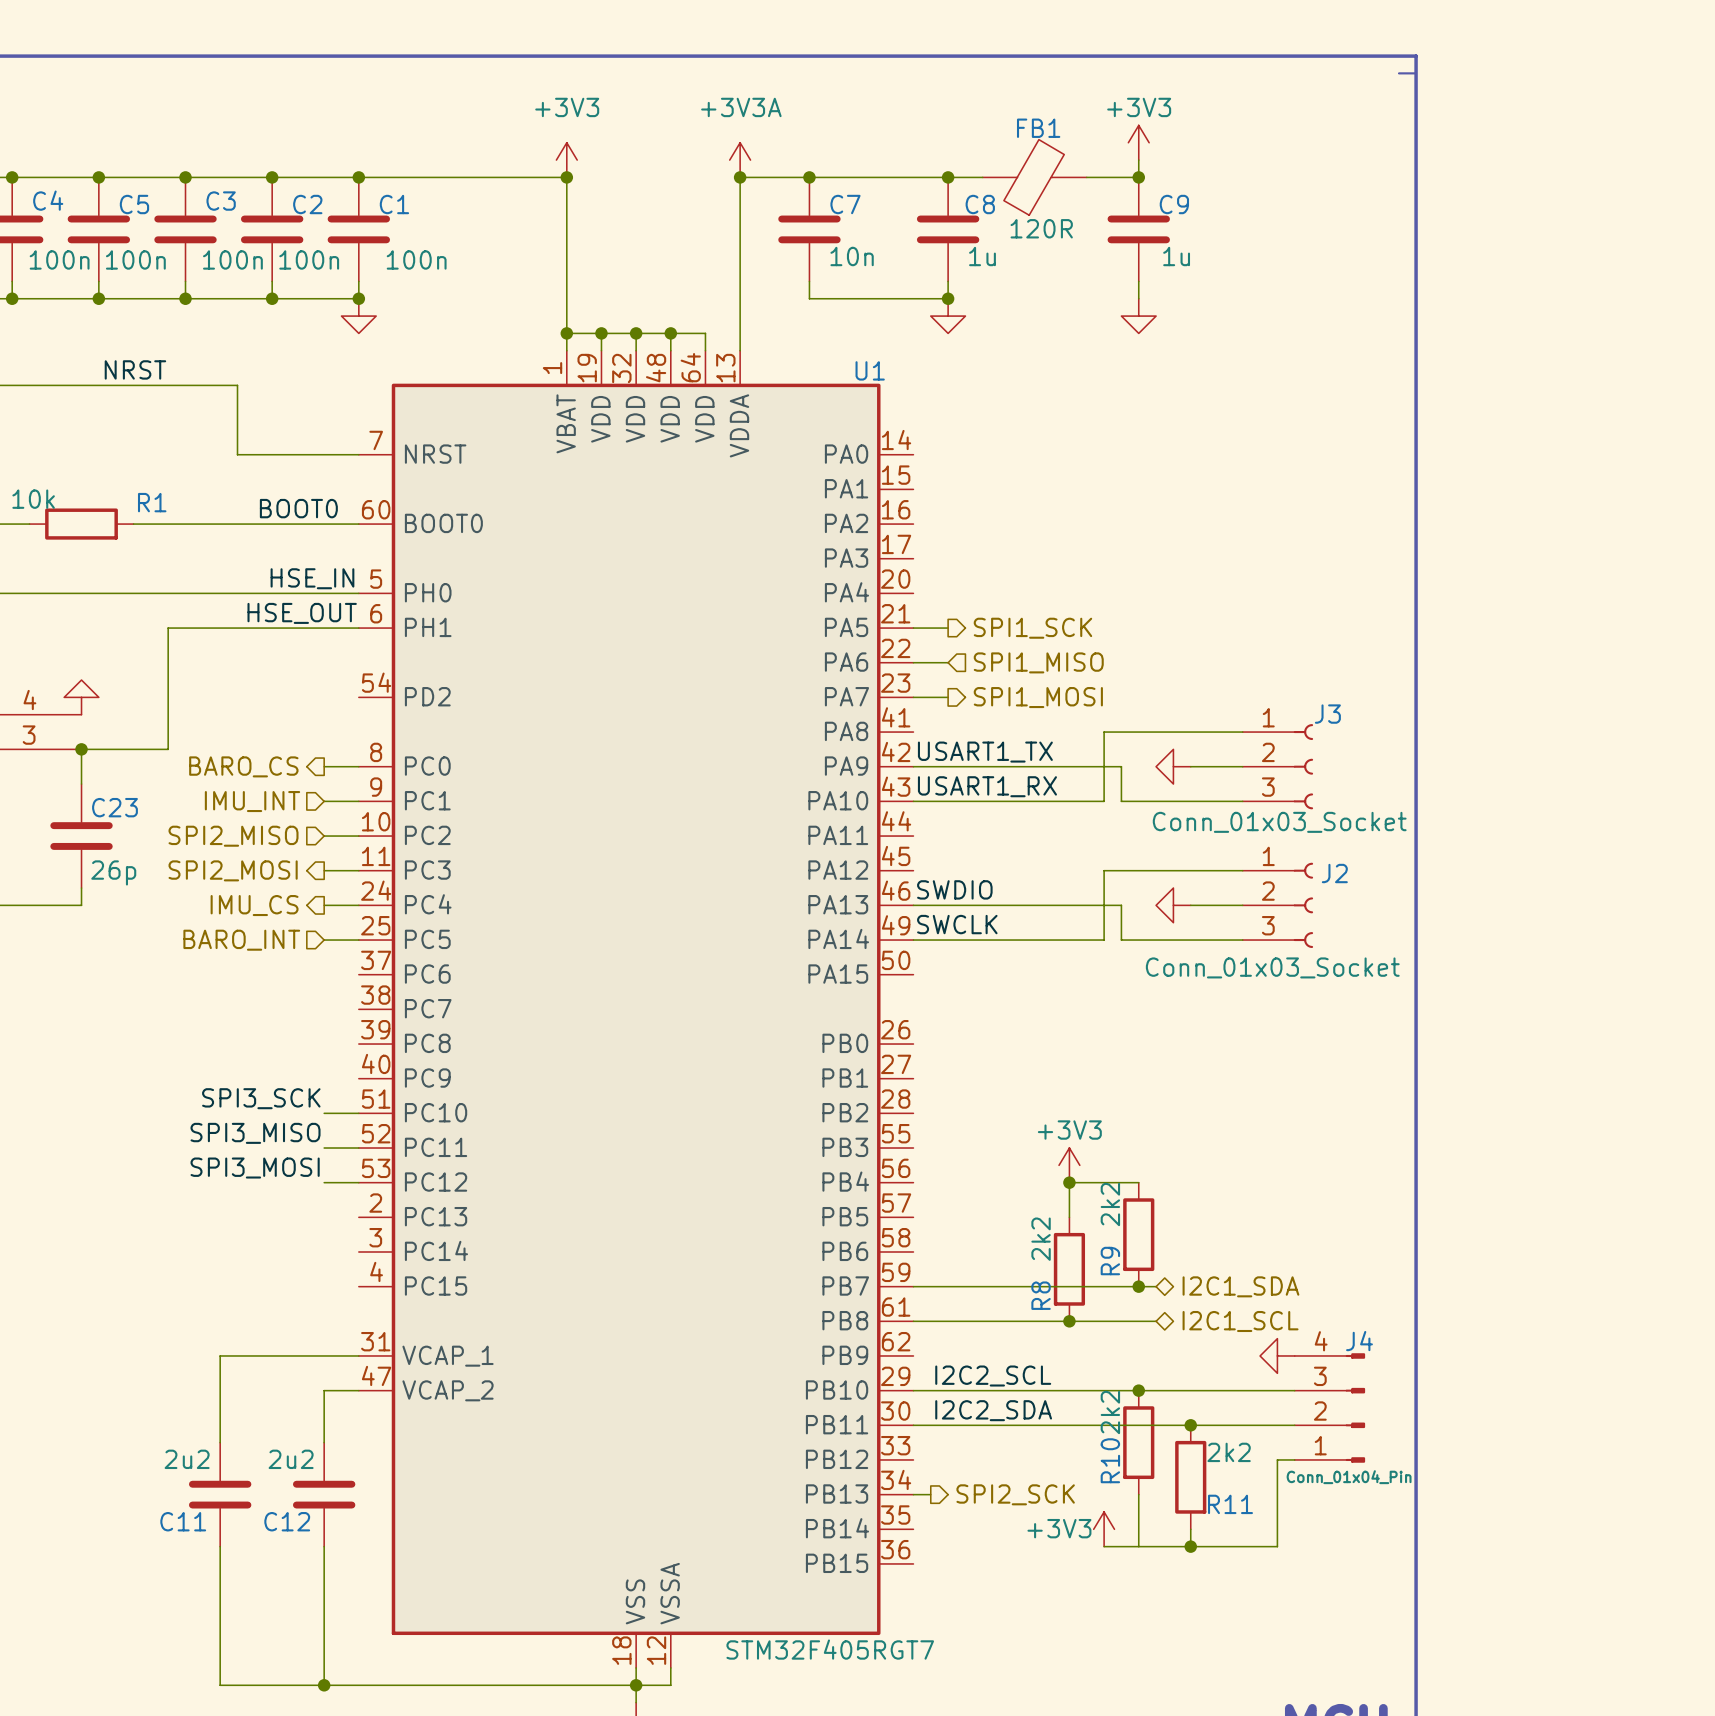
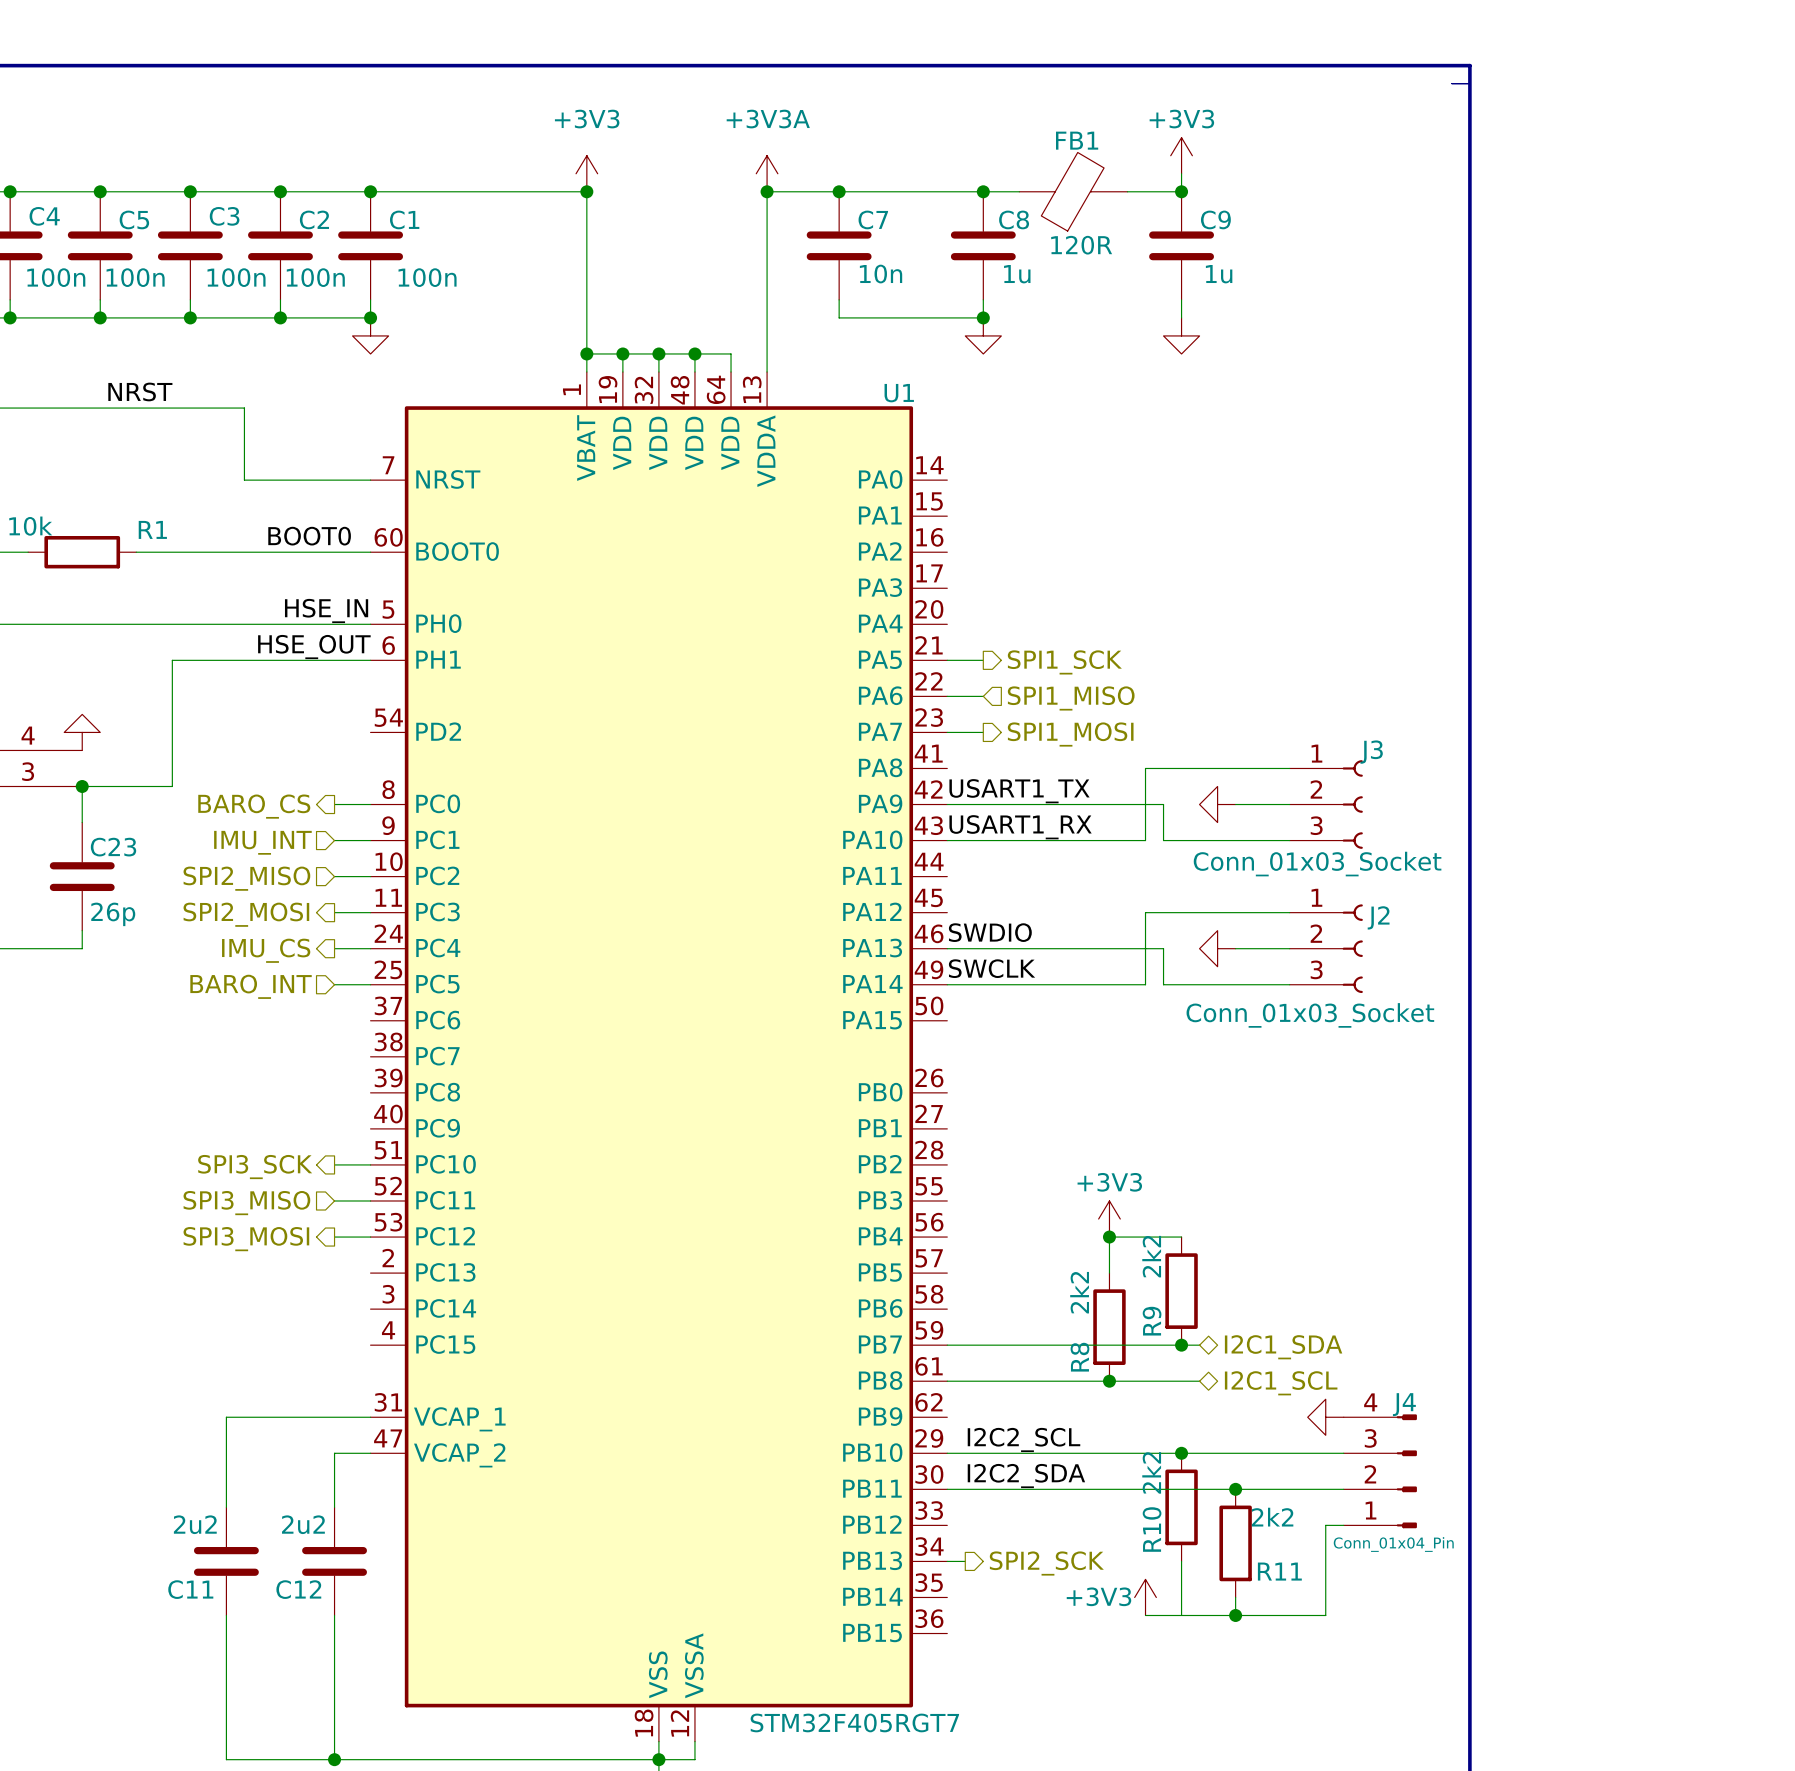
label: SPI3_SCK (261, 1098) -> none
hierarchical label: none -> SPI3_SCK (255, 1167)
label: SPI3_MISO (255, 1133) -> none
hierarchical label: none -> SPI3_MISO (246, 1203)
label: SPI3_MOSI (255, 1168) -> none
hierarchical label: none -> SPI3_MOSI (246, 1239)

